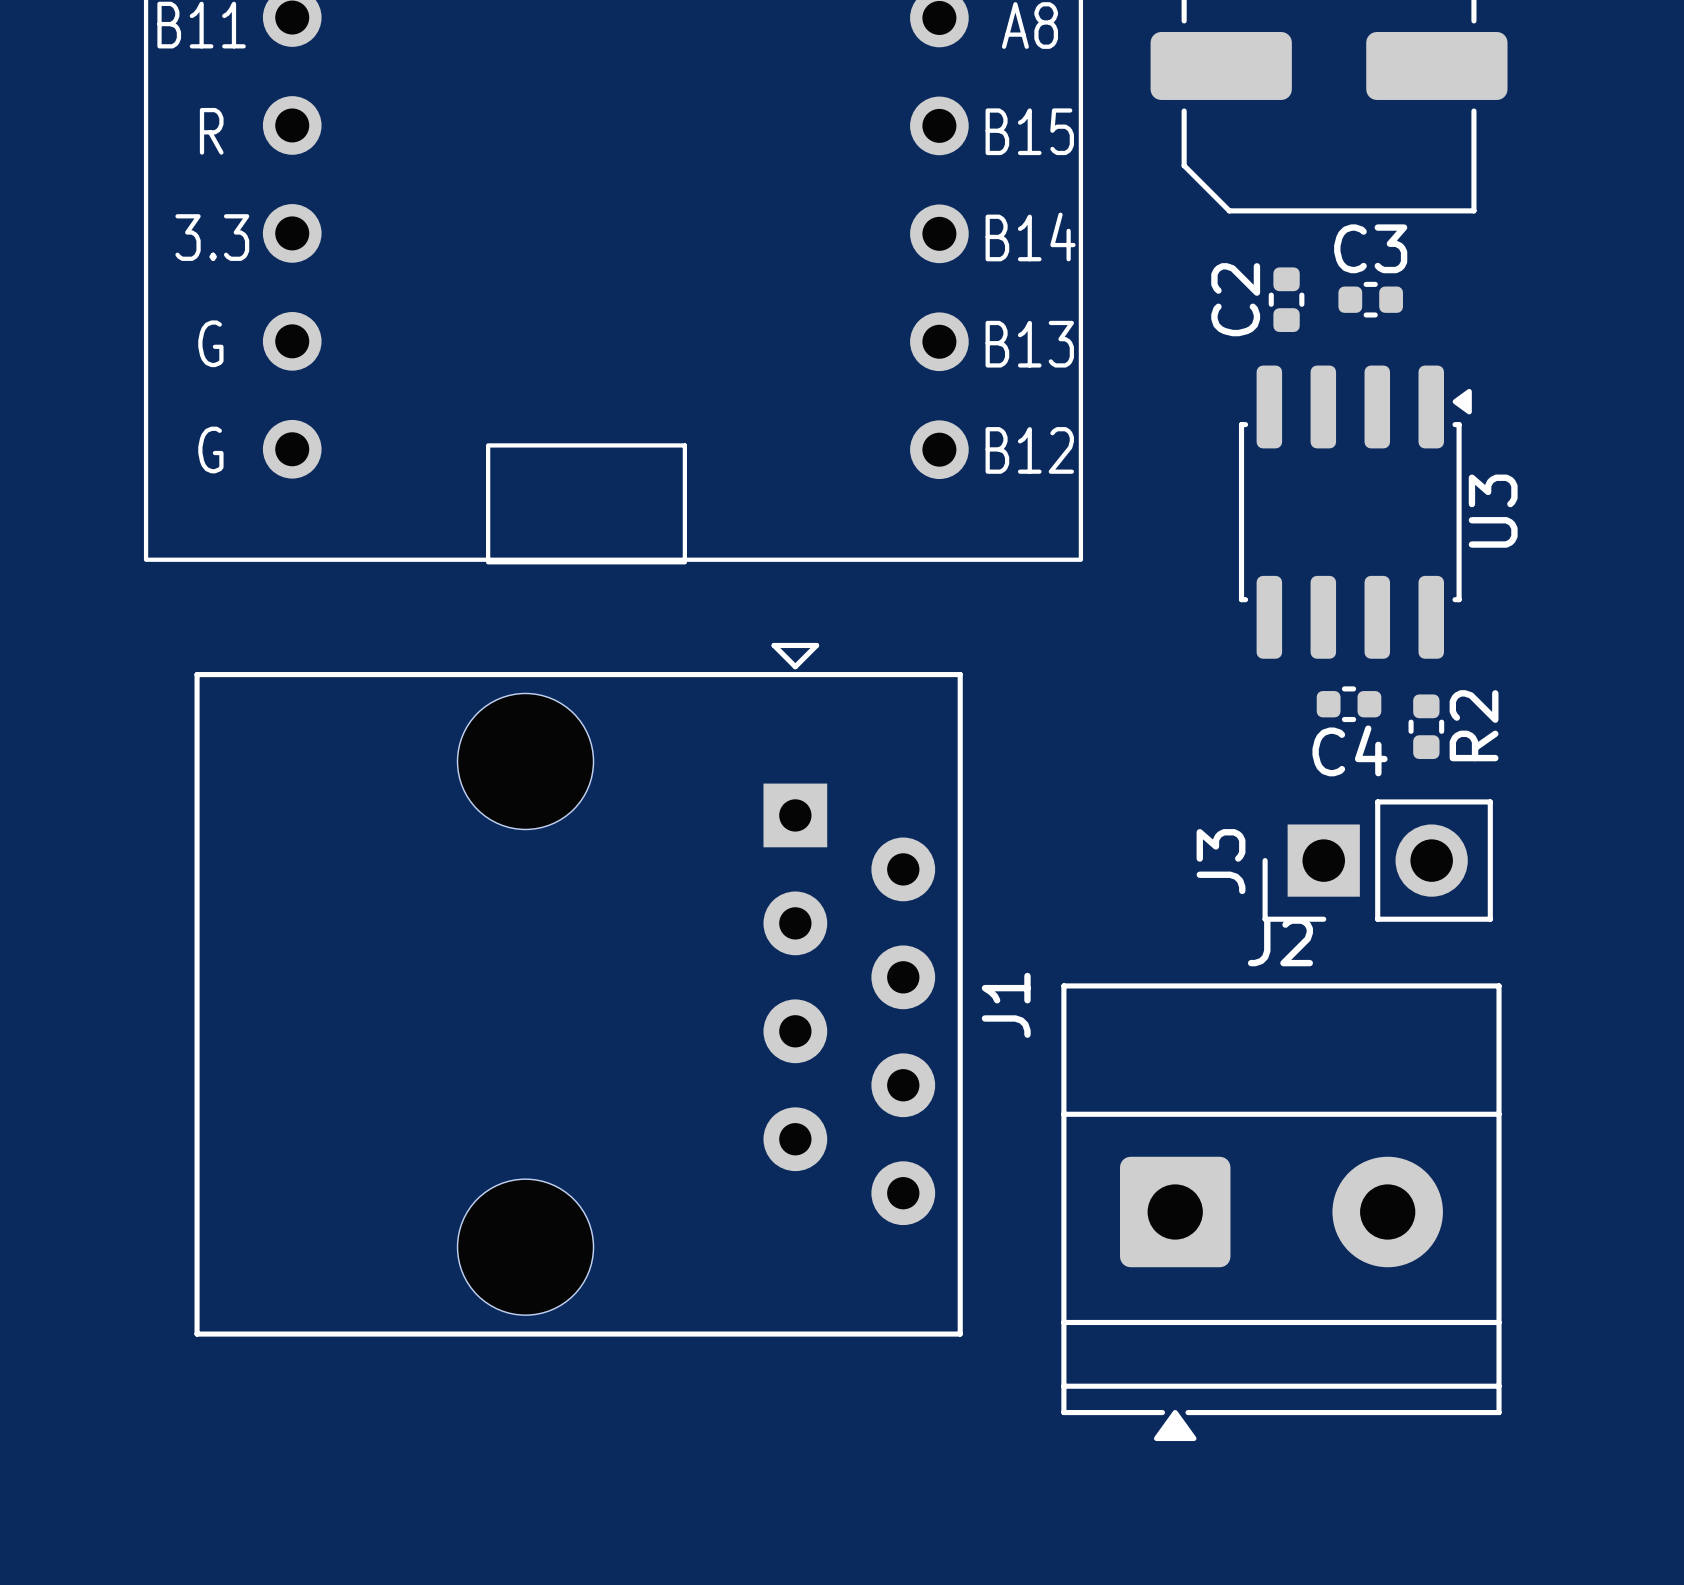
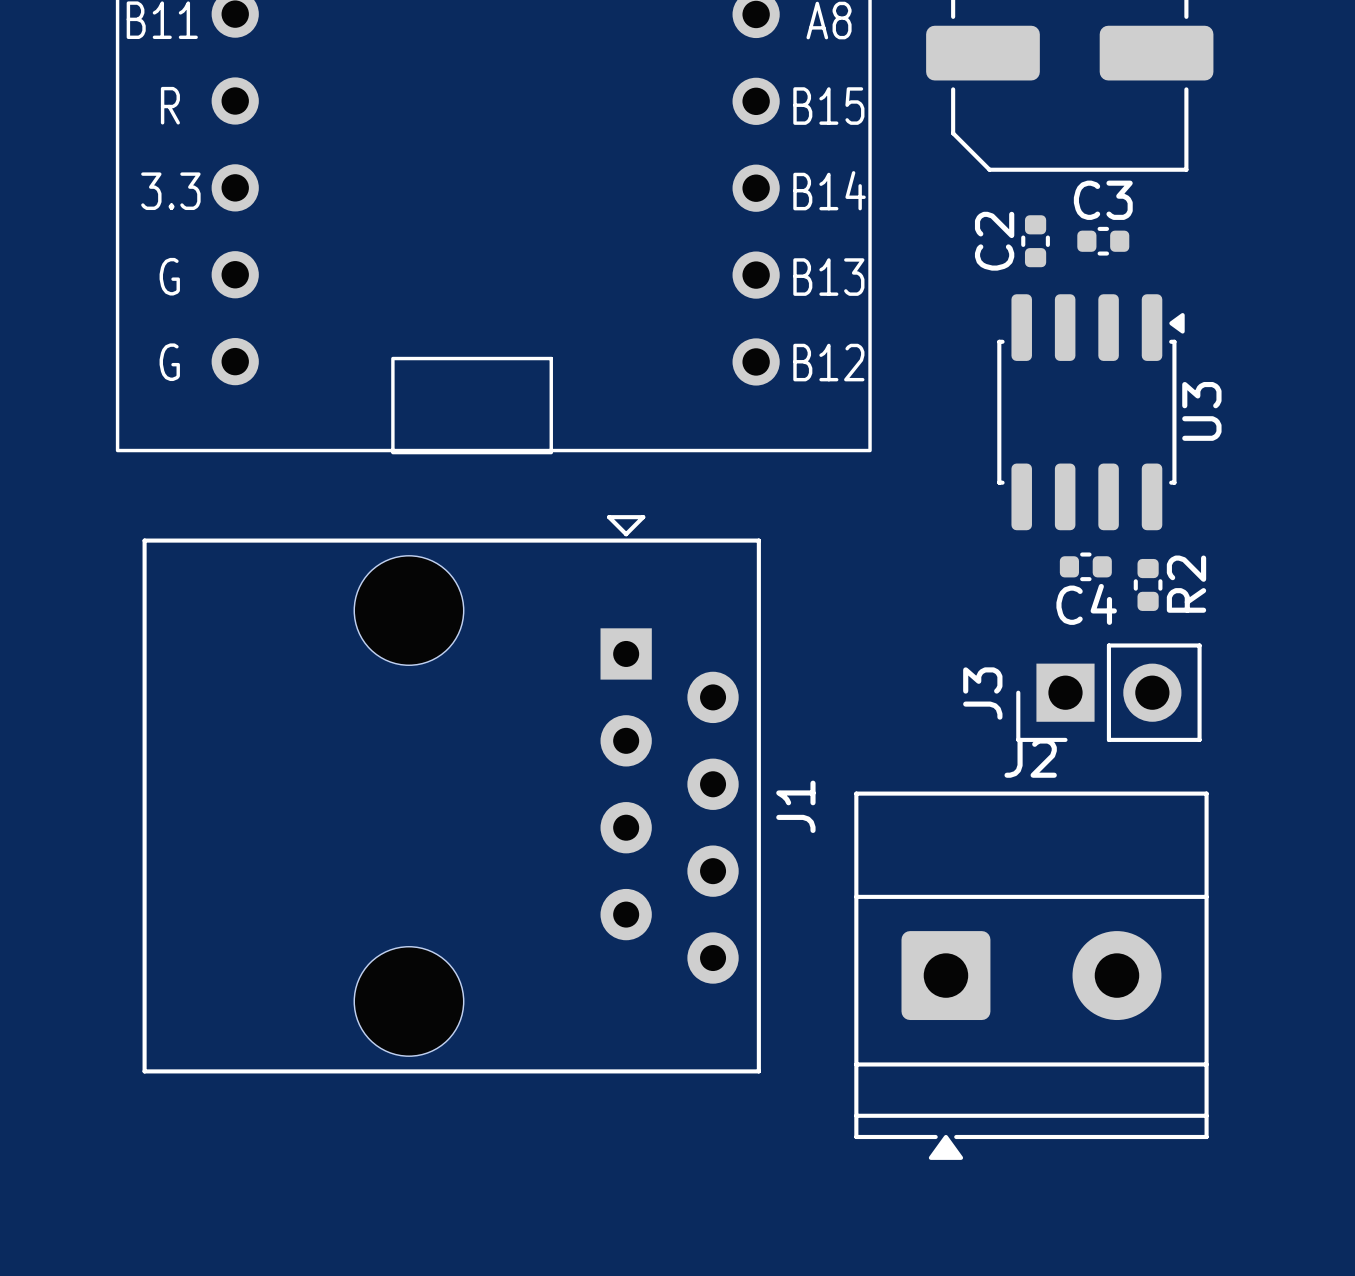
J1 position: (578, 989) -> (451, 794)

